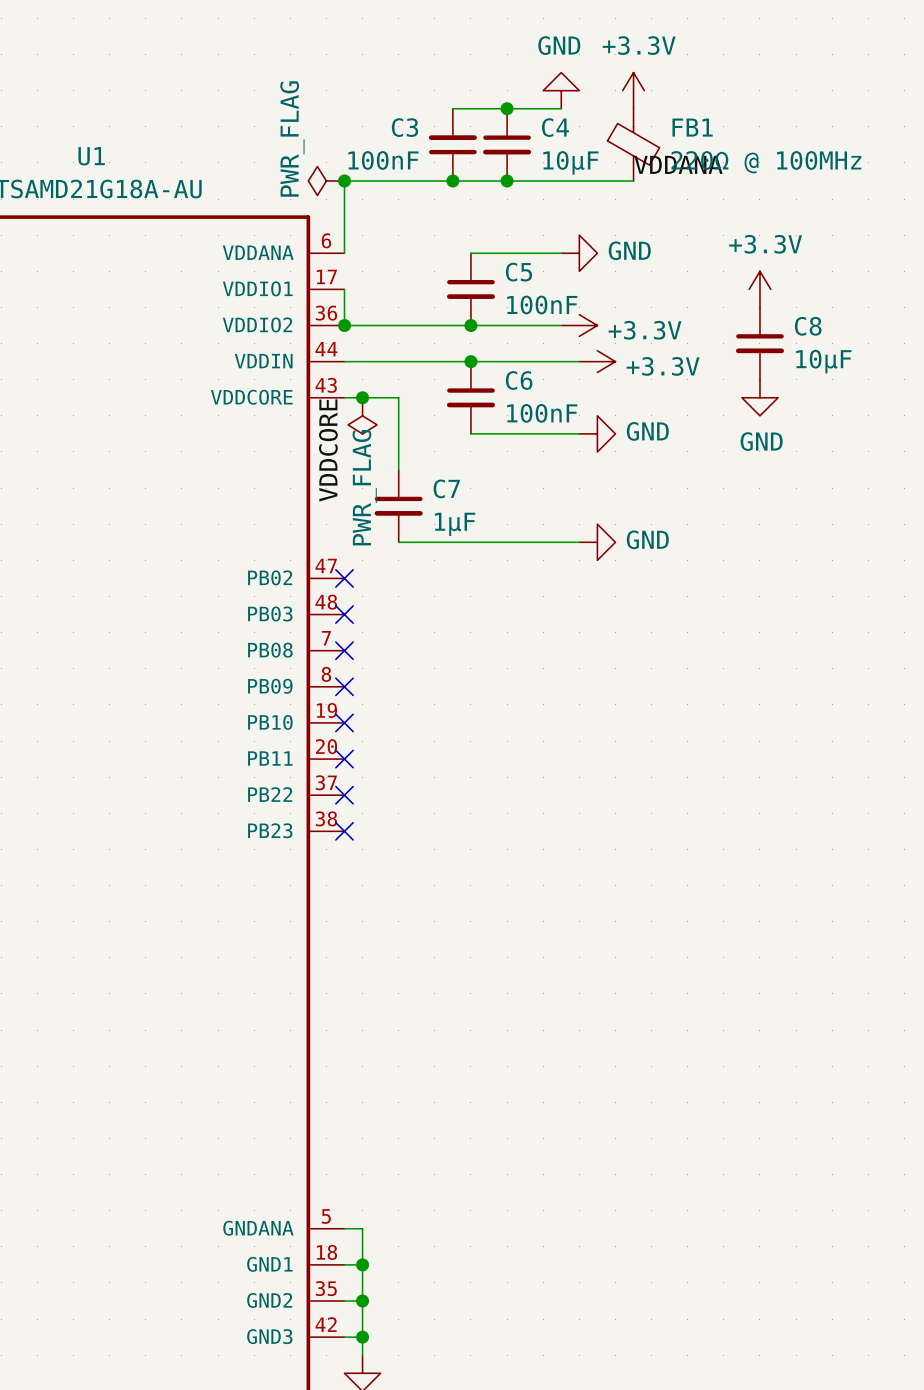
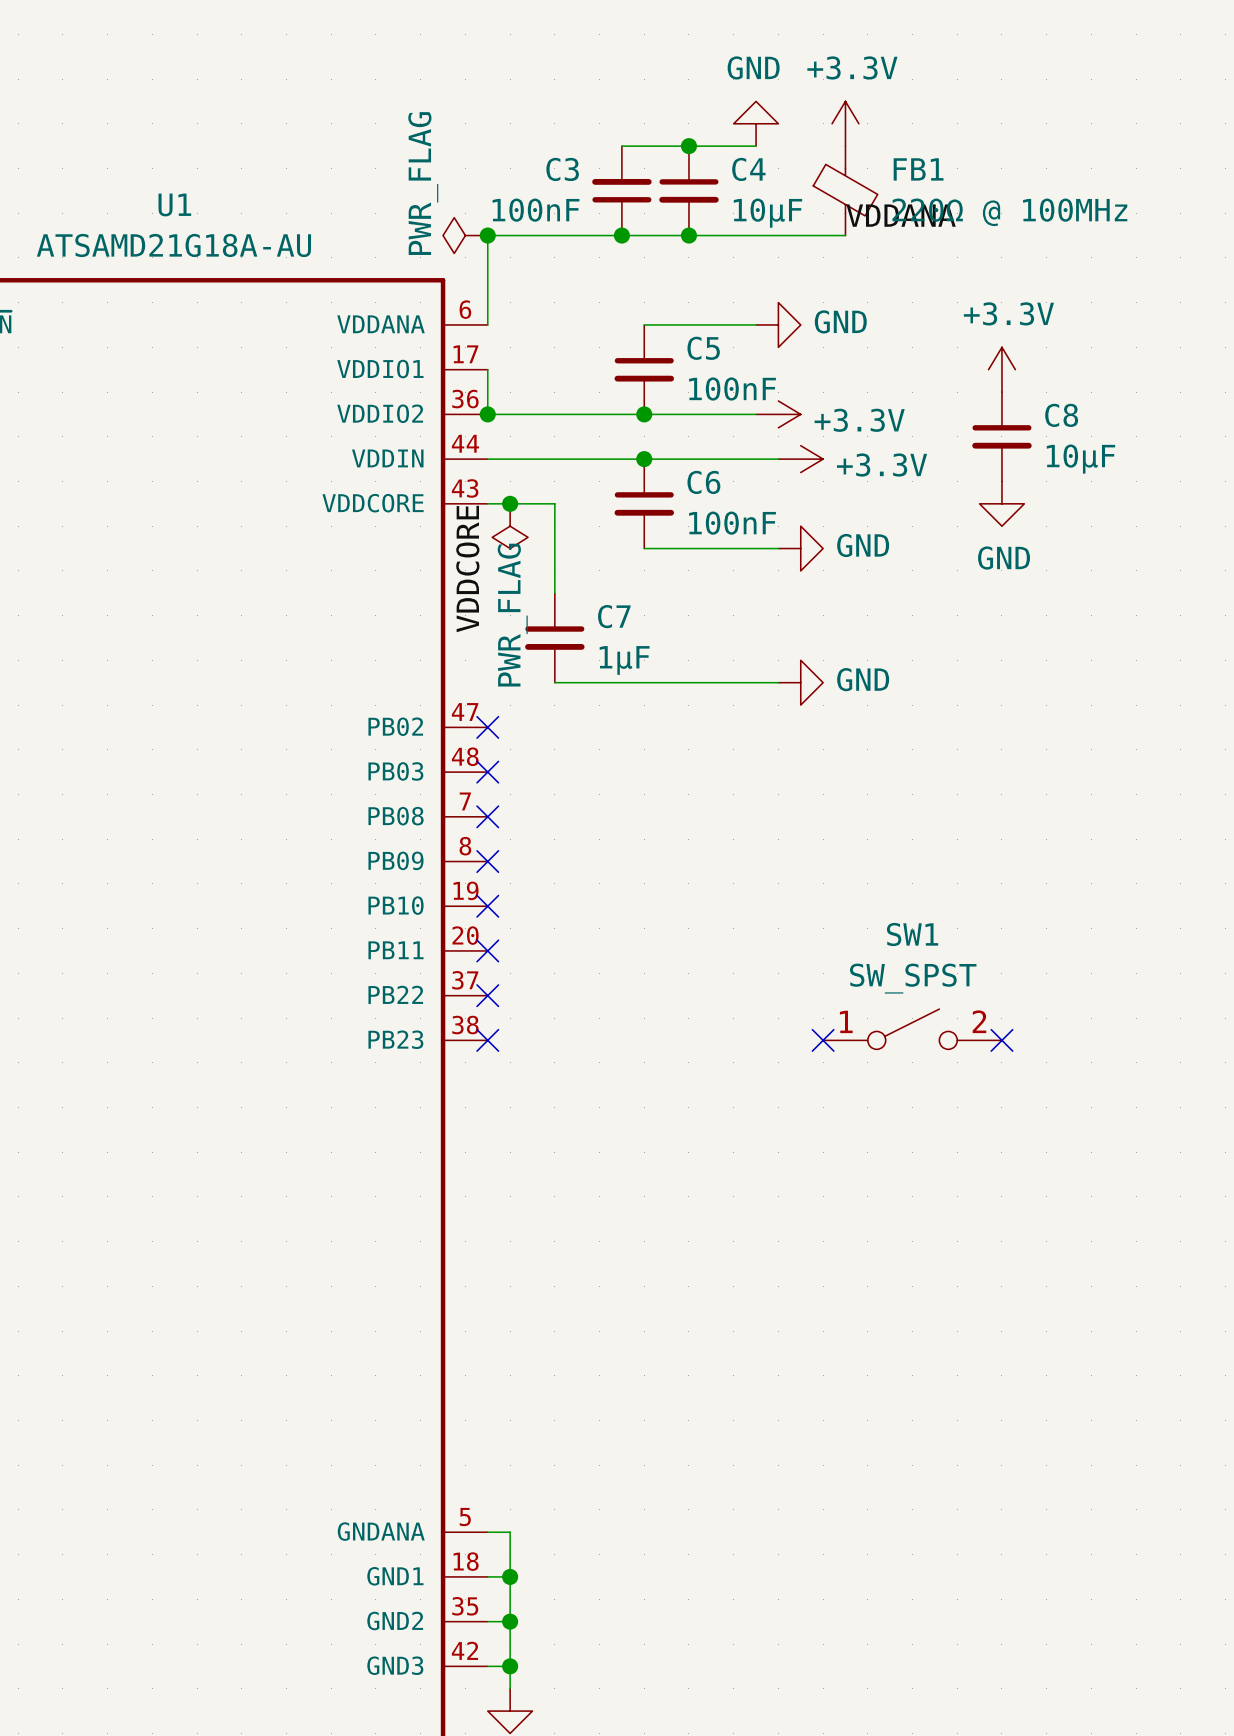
SW1: none -> SW_SPST (912, 1029)
no-connect mark: none -> (823, 1040)
no-connect mark: none -> (1001, 1040)

